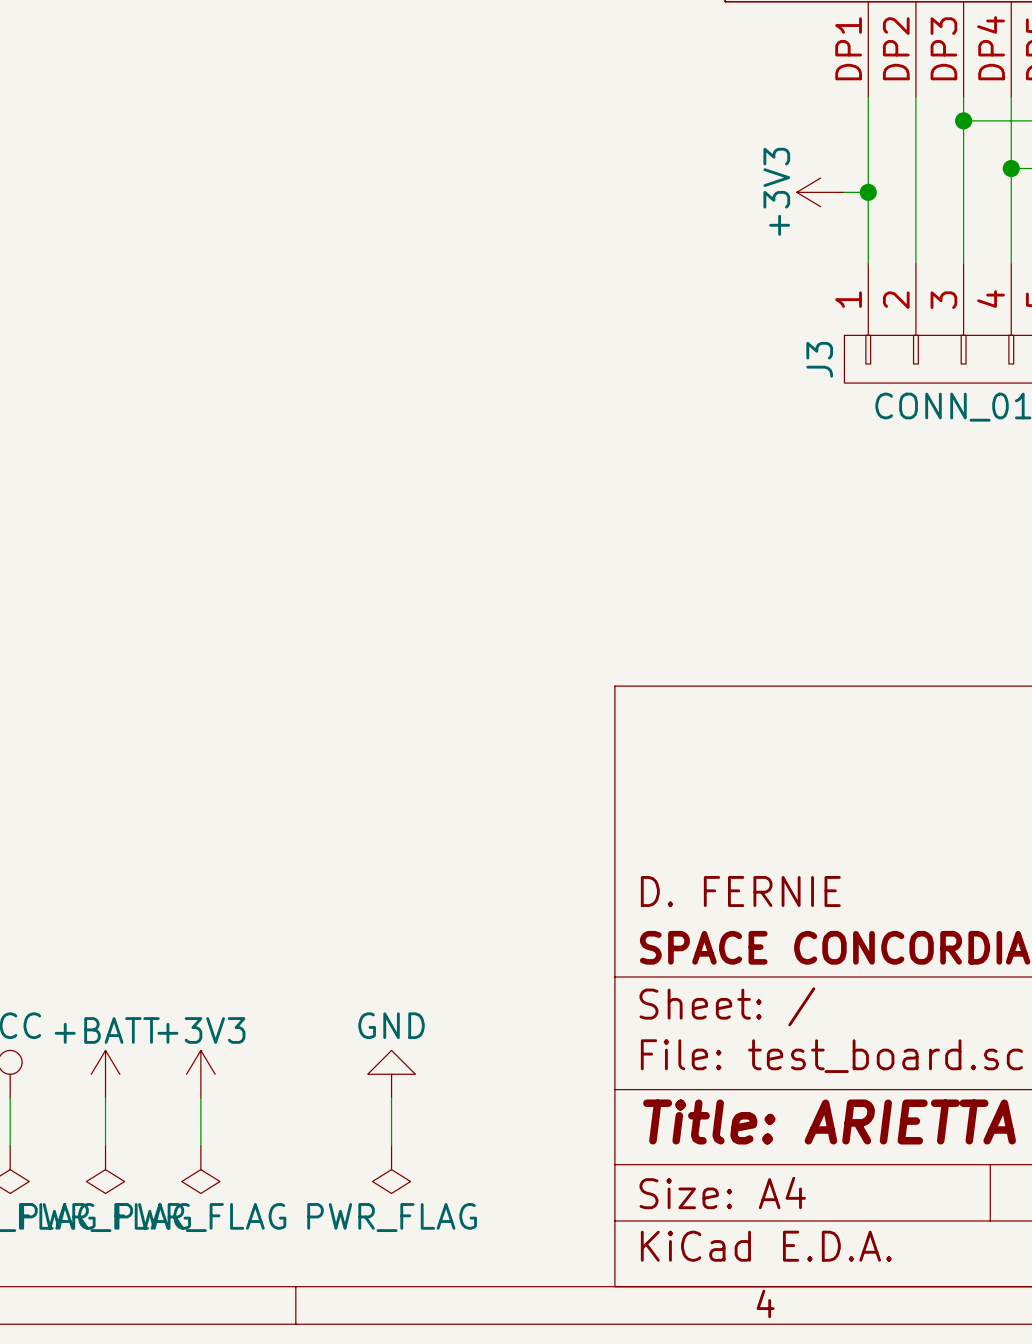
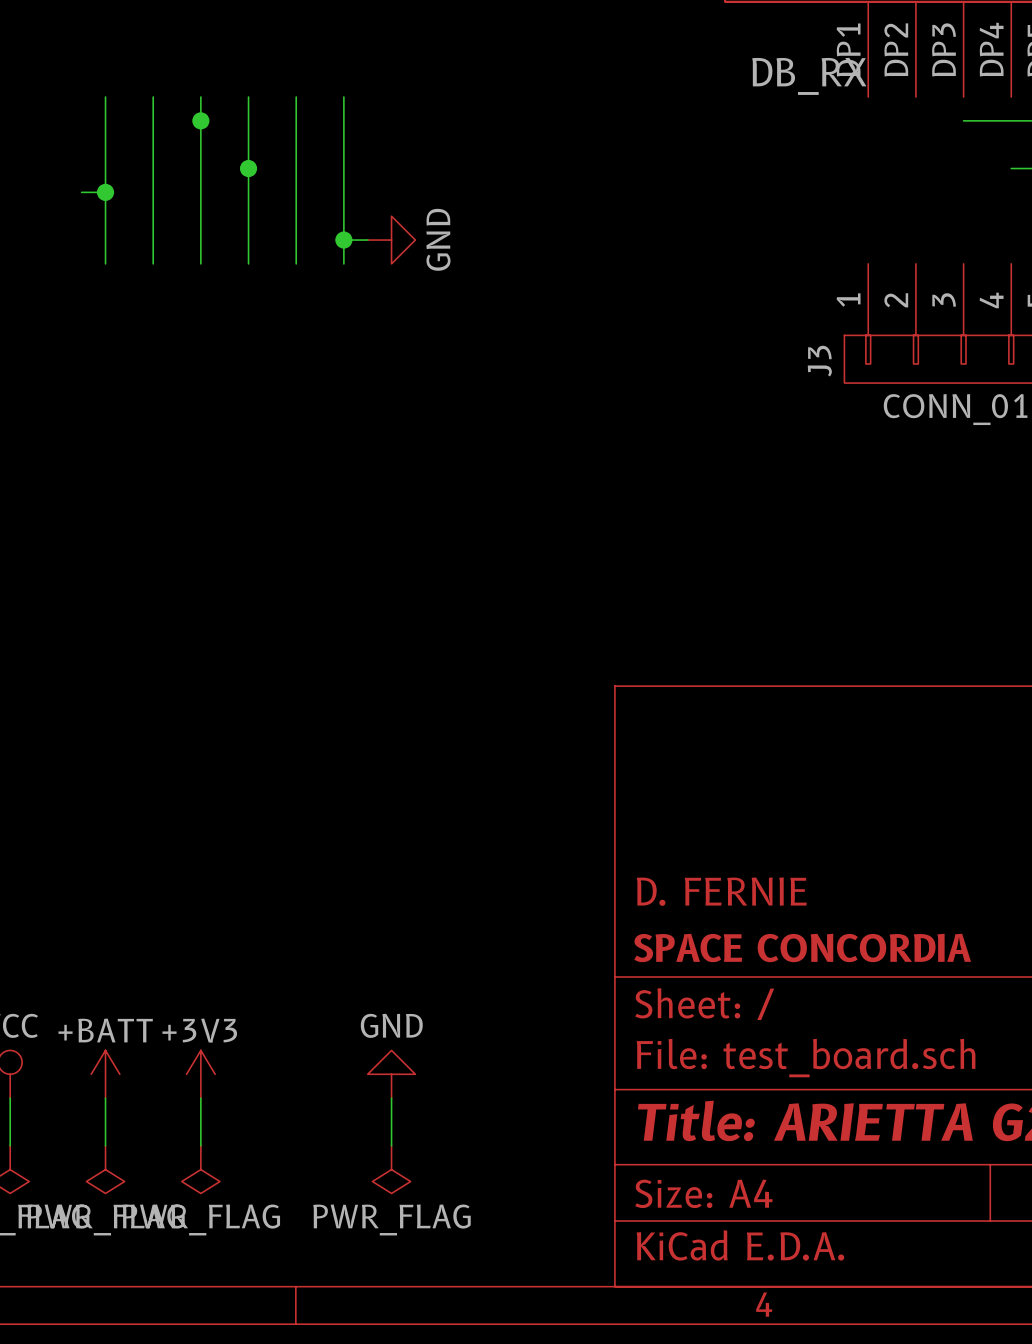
label: none -> DB_RX (809, 76)
wire: none -> (105, 97) (105, 263)
wire: none -> (153, 97) (153, 263)
wire: none -> (200, 97) (200, 263)
wire: none -> (248, 97) (248, 263)
wire: none -> (296, 97) (296, 263)
wire: none -> (343, 97) (343, 263)
wire: (868, 97) (868, 263) -> none
wire: (915, 97) (915, 263) -> none
wire: (963, 97) (963, 263) -> none
wire: (1011, 97) (1011, 263) -> none
junction: none -> (200, 120)
junction: (963, 120) -> none
junction: none -> (248, 168)
junction: (1011, 168) -> none
wire: none -> (81, 192) (105, 192)
junction: none -> (105, 192)
power symbol: +3V3 (820, 192) -> none
wire: (844, 192) (868, 192) -> none
junction: (868, 192) -> none
wire: none -> (343, 240) (367, 240)
junction: none -> (343, 240)
power symbol: none -> GND (391, 240)

